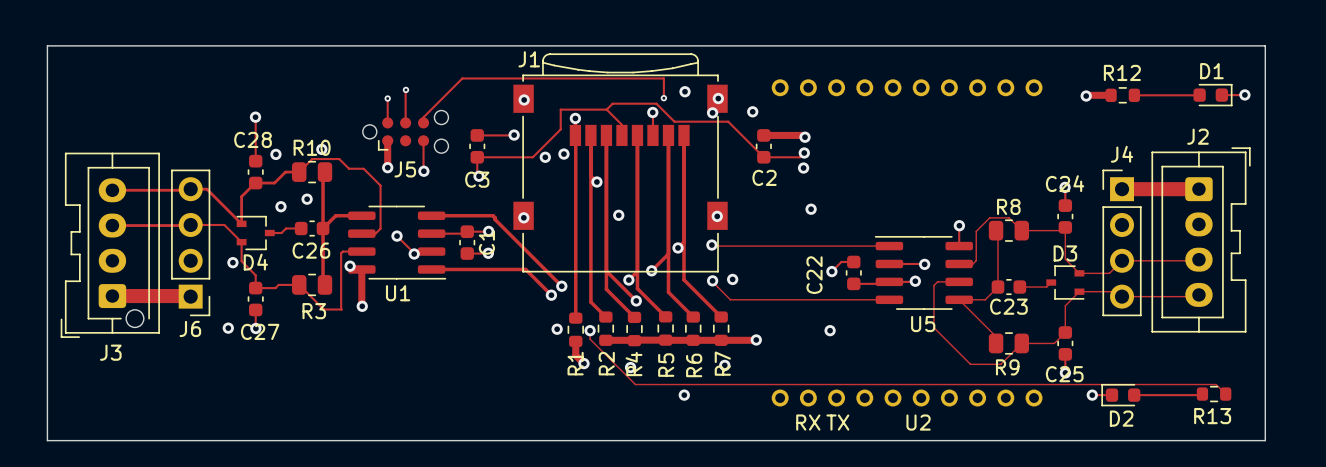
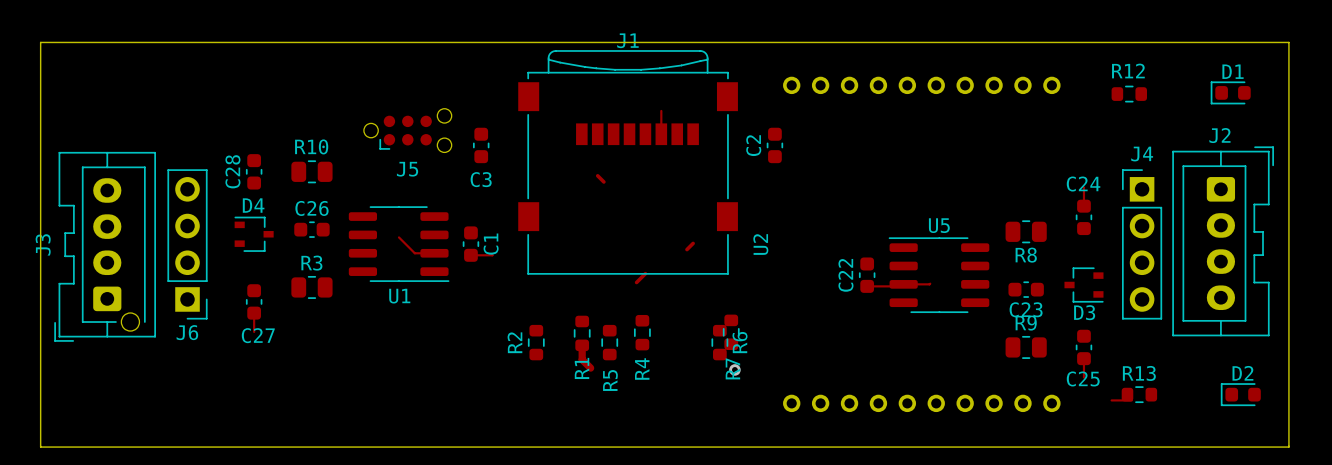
J1 name position: J1 (529, 59) -> J1 (627, 40)
track: (405, 89) (405, 122) -> none
via: (405, 89) -> none
via: (685, 91) -> none
via: (1244, 94) -> none
track: (1111, 95) (1086, 96) -> none
R12 position: (1122, 95) -> (1129, 94)
track: (1199, 95) (1134, 95) -> none
D1 rotation: 0° (1212, 95) -> 180° (1230, 92)
track: (1221, 95) (1244, 95) -> none
via: (1086, 96) -> none
track: (387, 98) (387, 122) -> none
via: (387, 98) -> none
track: (663, 98) (663, 78) (462, 78) (423, 117) (423, 122) -> none
via: (663, 98) -> none
via: (718, 98) -> none
via: (524, 99) -> none
track: (606, 109) (560, 109) (560, 129) (532, 157) (477, 157) (477, 174) (479, 176) -> none
track: (606, 109) (621, 124) (621, 135) -> none
track: (606, 109) (612, 103) (656, 103) (674, 121) (728, 121) (763, 157) (799, 157) (804, 152) -> none
via: (752, 111) -> none
via: (652, 112) -> none
via: (712, 112) -> none
track: (255, 117) (255, 161) -> none
via: (255, 117) -> none
track: (575, 118) (575, 318) -> none
via: (575, 118) -> none
track: (514, 135) (477, 135) -> none
via: (514, 135) -> none
track: (590, 135) (590, 302) (605, 317) -> none
track: (606, 135) (606, 289) (634, 317) -> none
track: (637, 135) (637, 288) (665, 316) -> none
track: (668, 135) (668, 292) (693, 317) -> none
track: (684, 135) (684, 279) (721, 317) -> none
track: (763, 135) (803, 135) (805, 137) -> none
via: (805, 137) -> none
C28 name rotation: 0° (253, 139) -> 90° counterclockwise (232, 171)
track: (387, 140) (387, 167) -> none
track: (423, 140) (423, 171) -> none
via: (321, 149) -> none
via: (804, 152) -> none
via: (275, 154) -> none
via: (563, 154) -> none
via: (545, 157) -> none
via: (387, 167) -> none
via: (803, 168) -> none
via: (423, 171) -> none
track: (324, 172) (323, 174) (323, 282) (324, 284) -> none
via: (479, 176) -> none
C2 name rotation: 0° (764, 177) -> 90° counterclockwise (753, 145)
C2 name position: C2 (764, 177) -> C2 (753, 145)
via: (596, 181) -> none
via: (1065, 187) -> none
track: (1122, 189) (1198, 189) -> none
track: (112, 190) (206, 189) (241, 223) (241, 196) (255, 183) (274, 183) (285, 172) (299, 172) (312, 159) (339, 159) (349, 168) (363, 168) (380, 185) (380, 228) (375, 233) (361, 233) -> none
via: (307, 199) -> none
via: (280, 206) -> none
R8 name position: R8 (1008, 206) -> R8 (1026, 255)
via: (811, 209) -> none
track: (361, 215) (335, 215) (323, 228) (324, 230) -> none
track: (431, 215) (493, 215) (561, 286) -> none
via: (618, 215) -> none
via: (717, 216) -> none
via: (523, 217) -> none
track: (112, 225) (224, 224) (241, 242) (241, 261) (255, 275) (255, 288) (299, 284) (323, 309) (341, 309) (341, 253) (342, 251) (361, 251) -> none
track: (959, 225) (959, 246) -> none
via: (959, 225) -> none
track: (301, 228) (286, 228) (281, 233) (269, 233) -> none
track: (996, 230) (997, 232) (997, 287) (985, 299) (959, 299) (996, 336) (996, 343) -> none
track: (488, 231) (431, 233) -> none
via: (488, 231) -> none
via: (397, 236) -> none
track: (711, 245) (889, 246) -> none
via: (711, 245) -> none
via: (678, 247) -> none
C26 name position: C26 (311, 250) -> C26 (311, 208)
via: (414, 253) -> none
via: (488, 253) -> none
D3 name position: D3 (1065, 253) -> D3 (1084, 312)
track: (668, 254) (651, 270) -> none
track: (1198, 259) (1122, 260) (1109, 273) (1079, 273) (1065, 259) (1065, 227) (1062, 230) (1021, 230) (1009, 217) (989, 217) (976, 231) (976, 260) (972, 263) (959, 263) (960, 263) -> none
via: (232, 262) -> none
D4 name position: D4 (255, 262) -> D4 (253, 205)
track: (853, 262) (841, 262) (831, 271) -> none
track: (889, 263) (924, 264) -> none
via: (924, 264) -> none
via: (350, 266) -> none
track: (361, 269) (362, 306) -> none
track: (431, 269) (525, 269) (551, 295) -> none
via: (651, 270) -> none
track: (606, 271) (636, 300) -> none
via: (831, 271) -> none
C22 name position: C22 (814, 275) -> C22 (845, 275)
via: (732, 279) -> none
via: (628, 280) -> none
track: (712, 280) (730, 299) (889, 299) -> none
via: (712, 280) -> none
via: (915, 281) -> none
track: (959, 281) (937, 281) (933, 285) (933, 327) (970, 364) (1000, 364) (1021, 343) (1054, 343) (1065, 332) (1065, 305) (1079, 291) (1117, 291) (1122, 296) (1197, 296) (1198, 294) -> none
track: (1051, 282) (1046, 287) (1019, 287) -> none
via: (561, 286) -> none
via: (551, 295) -> none
track: (112, 296) (190, 296) -> none
via: (636, 300) -> none
via: (362, 306) -> none
R3 name position: R3 (314, 311) -> R3 (311, 263)
U5 name position: U5 (923, 324) -> U5 (939, 225)
via: (228, 328) -> none
via: (255, 328) -> none
R2 position: (605, 328) -> (536, 342)
R5 position: (665, 328) -> (609, 342)
R6 position: (693, 328) -> (719, 342)
via: (557, 329) -> none
track: (590, 330) (590, 339) (635, 384) (1216, 384) (1225, 394) -> none
via: (590, 330) -> none
via: (830, 330) -> none
track: (756, 339) (665, 340) -> none
via: (756, 339) -> none
track: (665, 340) (606, 340) -> none
J3 name rotation: 0° (110, 352) -> 90° counterclockwise (43, 244)
J3 name position: J3 (110, 352) -> J3 (43, 244)
via: (584, 363) -> none
R2 name position: R2 (606, 363) -> R2 (514, 342)
R6 name position: R6 (694, 365) -> R6 (740, 342)
via: (630, 367) -> none
R9 name position: R9 (1007, 367) -> R9 (1026, 323)
via: (1065, 372) -> none
track: (1202, 394) (1134, 395) -> none
R13 position: (1214, 394) -> (1139, 394)
via: (684, 395) -> none
via: (1092, 395) -> none
D2 position: (1120, 395) -> (1240, 394)
R13 name position: R13 (1212, 416) -> R13 (1139, 373)
D2 name position: D2 (1121, 418) -> D2 (1242, 373)
text: RX (808, 422) -> none
text: TX (837, 422) -> none
U2 name rotation: 0° (918, 422) -> 90° counterclockwise (760, 244)
U2 name position: U2 (918, 422) -> U2 (760, 244)

